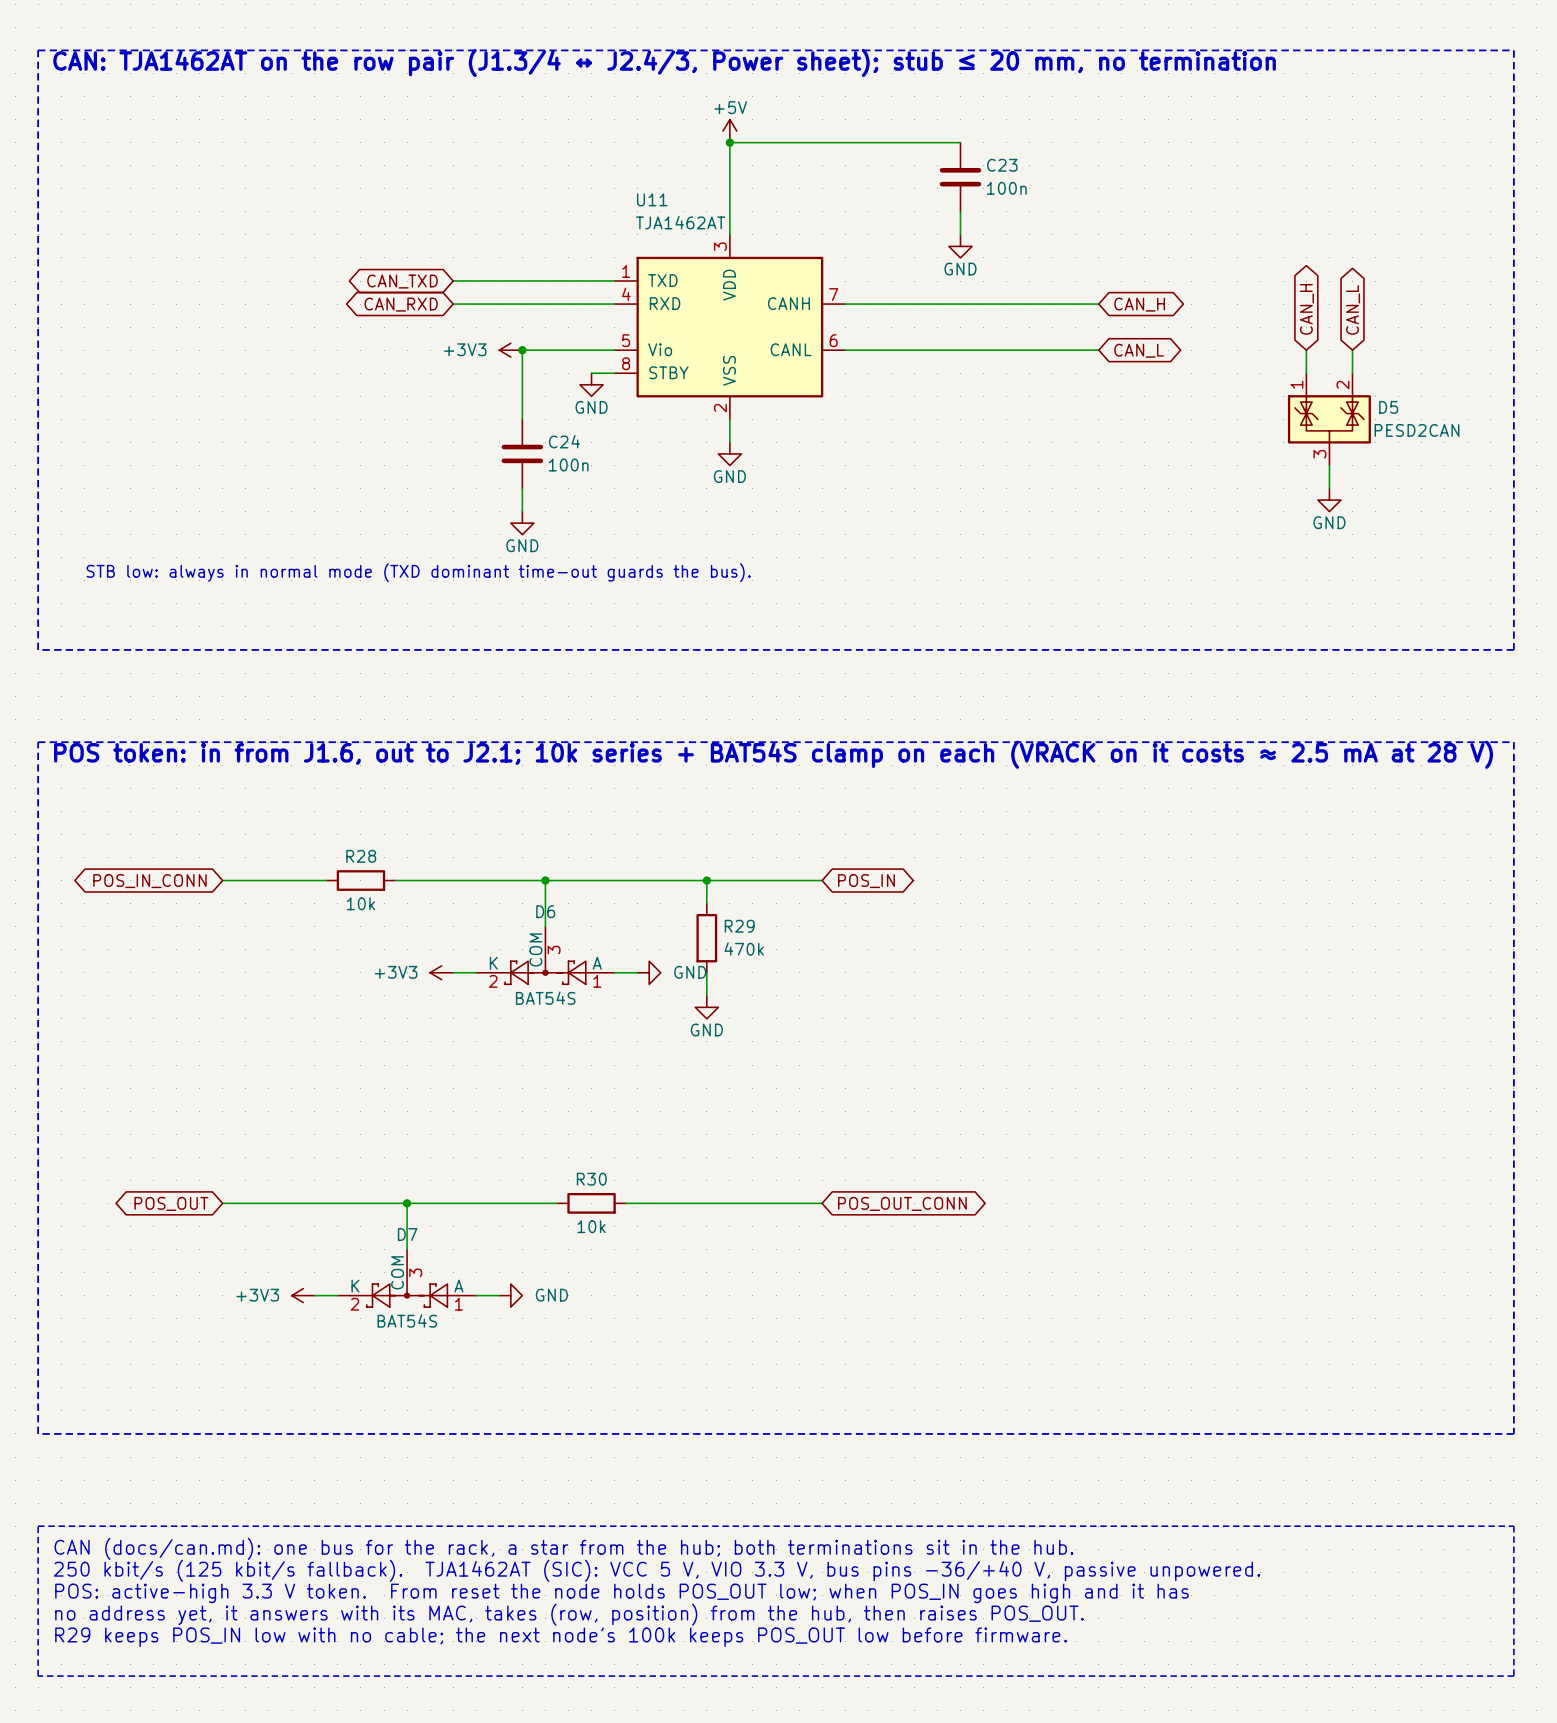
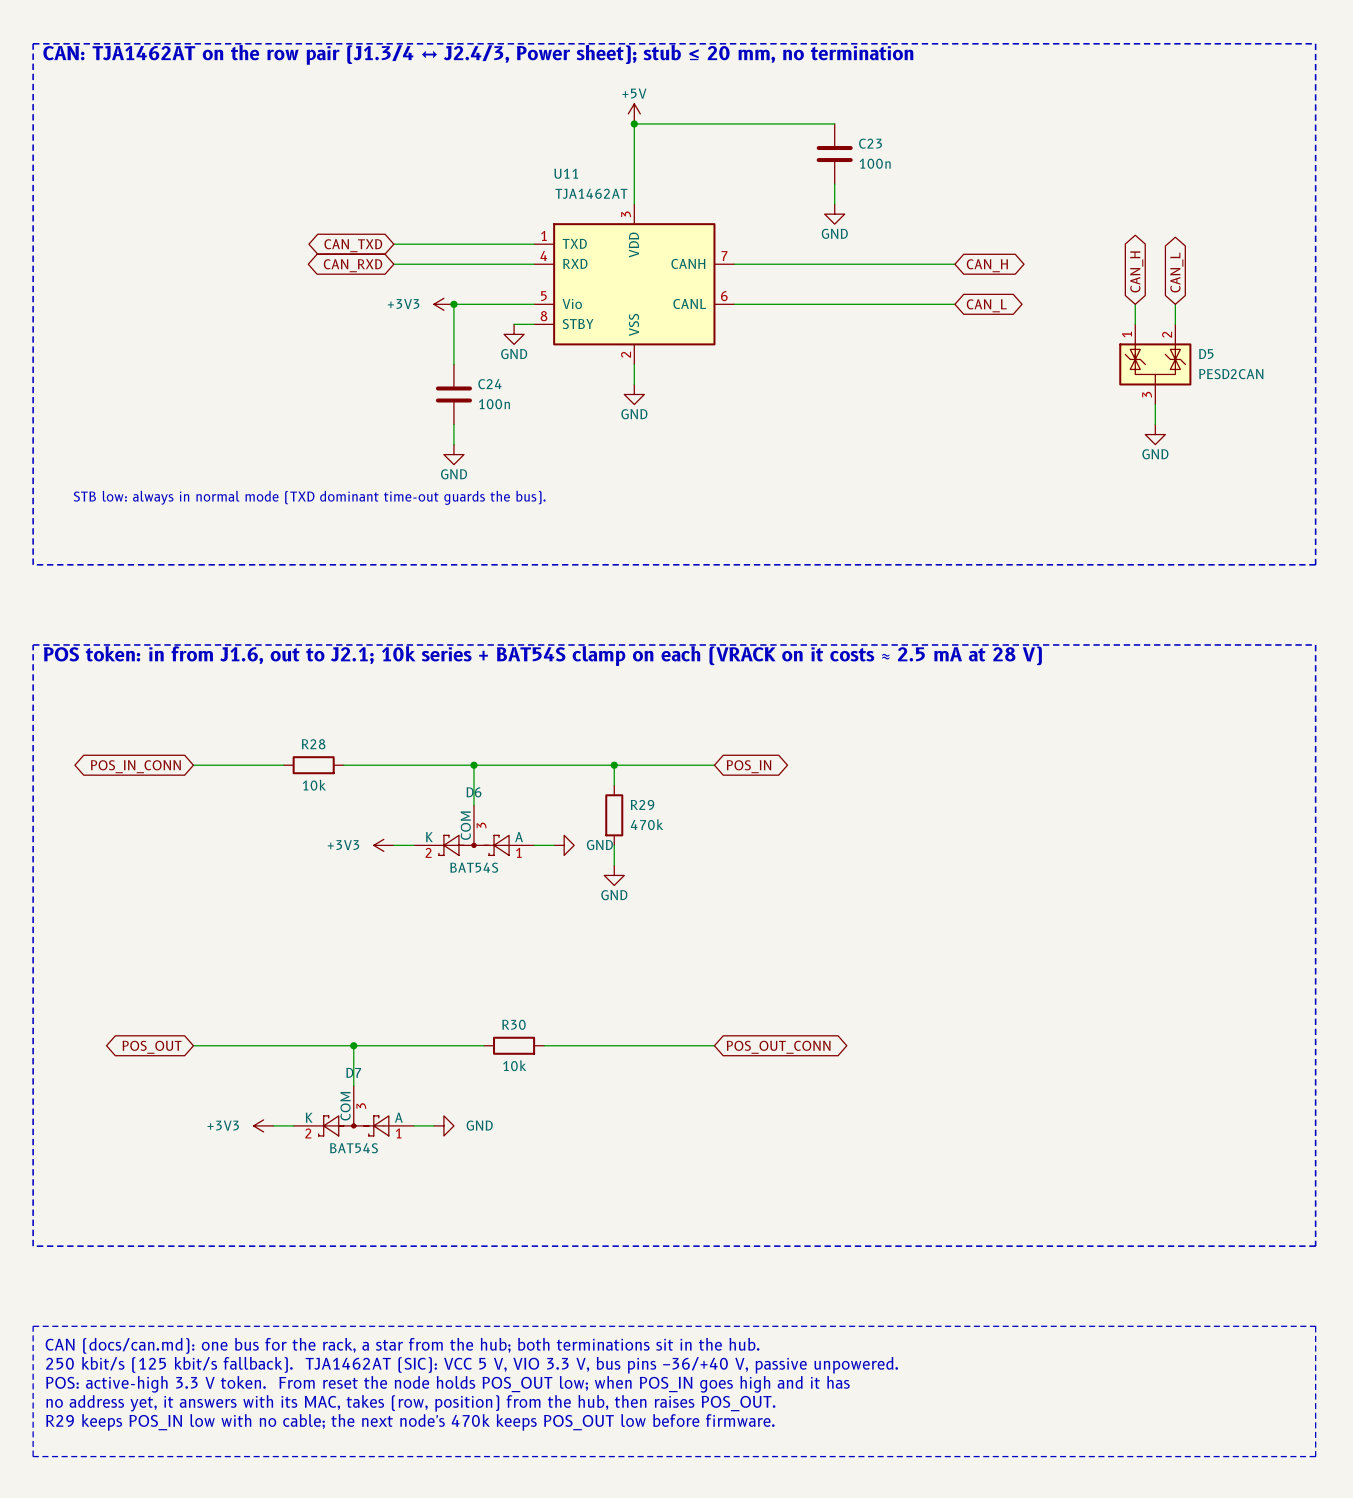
text: R29 keeps POS_IN low with no cable; the next node's 100k keeps POS_OUT low before firmware. (561, 1637) -> R29 keeps POS_IN low with no cable; the next node's 470k keeps POS_OUT low before firmware. (410, 1422)

